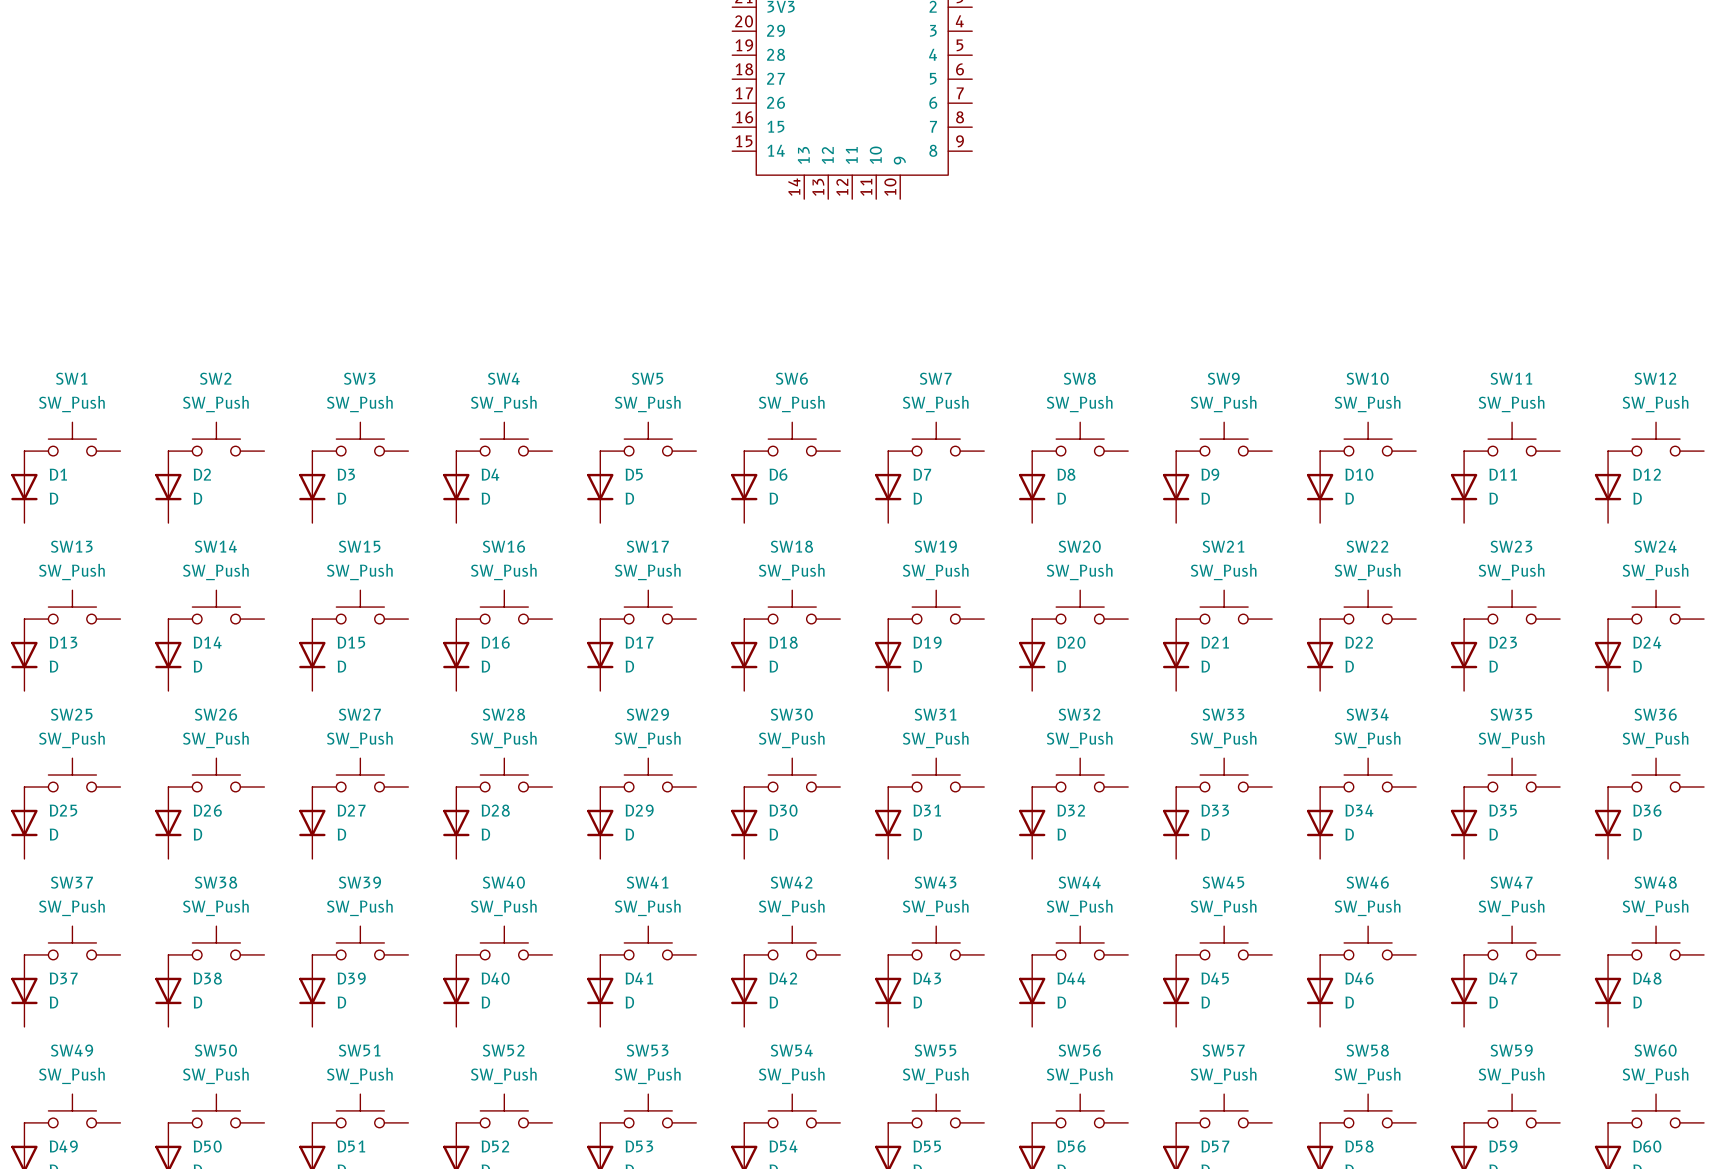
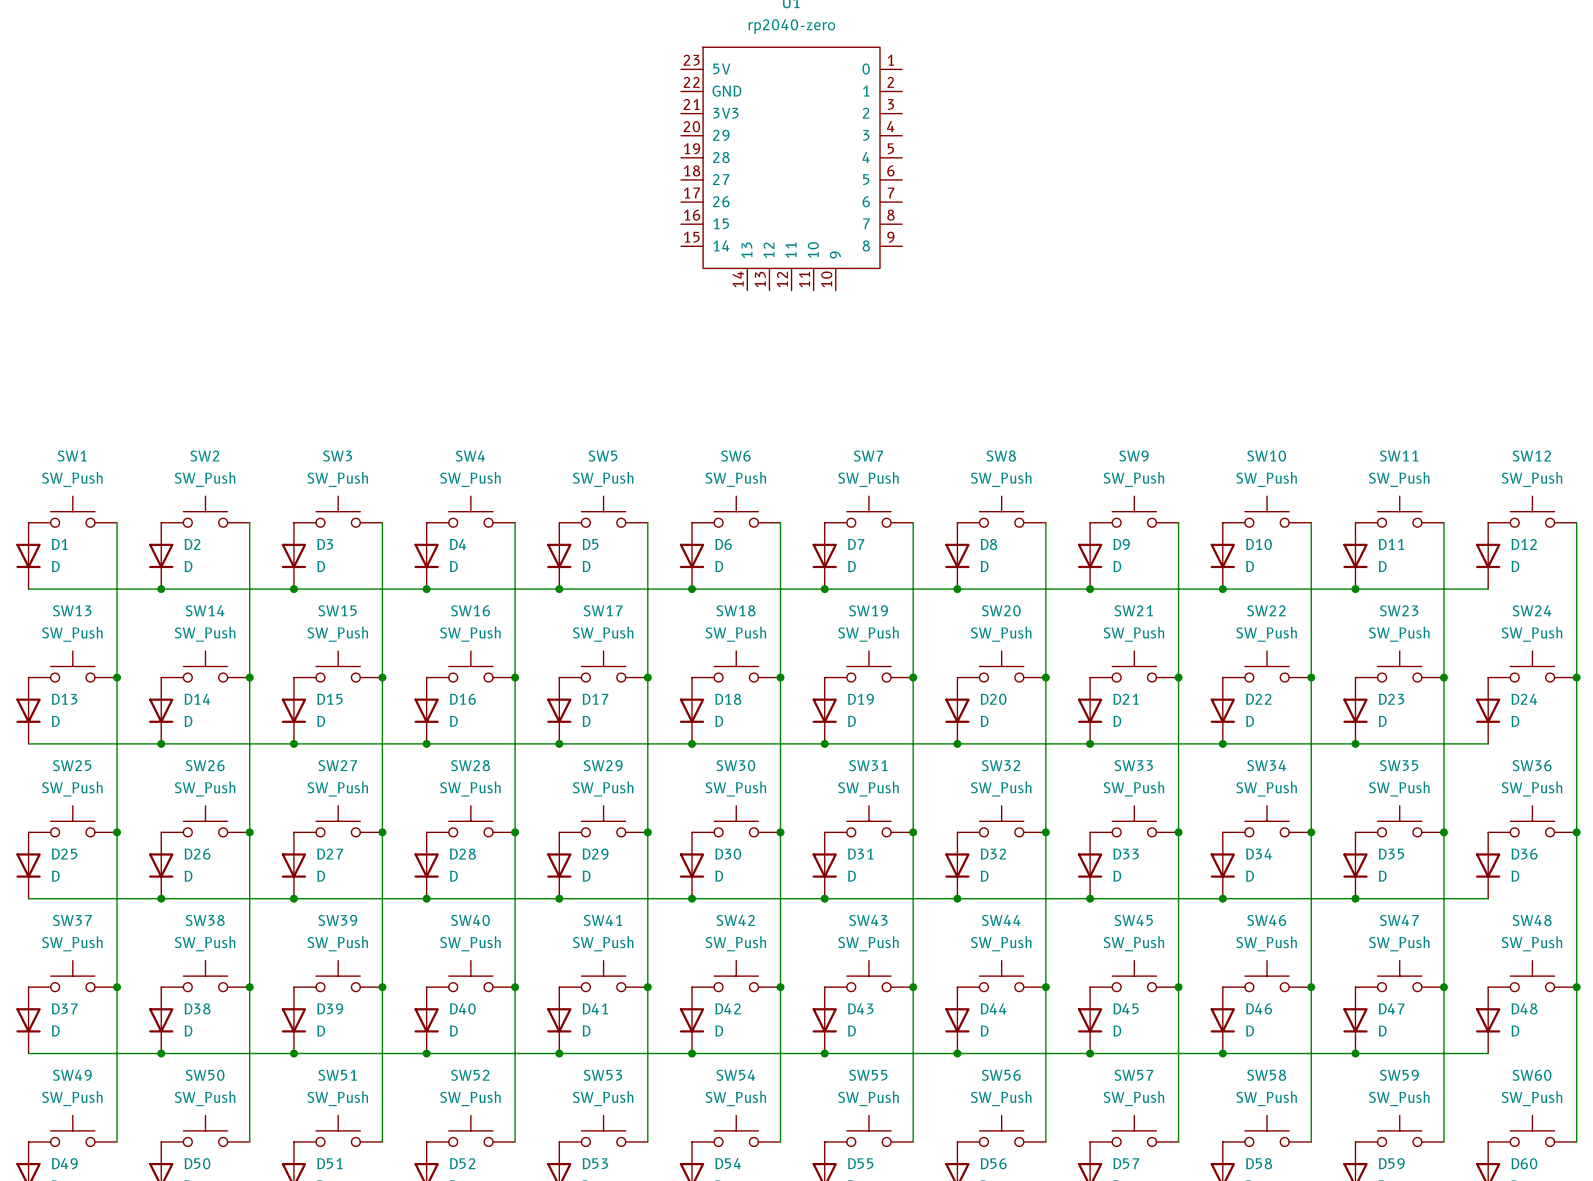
wire: none -> (117, 522) (117, 1141)
wire: none -> (249, 522) (249, 1141)
wire: none -> (382, 522) (382, 1141)
wire: none -> (515, 522) (515, 1141)
wire: none -> (647, 522) (647, 1141)
wire: none -> (780, 522) (780, 1141)
wire: none -> (913, 522) (913, 1141)
wire: none -> (1045, 522) (1045, 1141)
wire: none -> (1178, 522) (1178, 1141)
wire: none -> (1311, 522) (1311, 1141)
wire: none -> (1443, 522) (1443, 1141)
wire: none -> (1576, 522) (1576, 1141)
wire: none -> (28, 589) (1488, 589)
junction: none -> (161, 589)
junction: none -> (293, 589)
junction: none -> (426, 589)
junction: none -> (559, 589)
junction: none -> (692, 589)
junction: none -> (824, 589)
junction: none -> (957, 589)
junction: none -> (1090, 589)
junction: none -> (1222, 589)
junction: none -> (1355, 589)
junction: none -> (117, 677)
junction: none -> (249, 677)
junction: none -> (382, 677)
junction: none -> (515, 677)
junction: none -> (647, 677)
junction: none -> (780, 677)
junction: none -> (913, 677)
junction: none -> (1045, 677)
junction: none -> (1178, 677)
junction: none -> (1311, 677)
junction: none -> (1443, 677)
junction: none -> (1576, 677)
wire: none -> (28, 743) (1488, 743)
junction: none -> (161, 743)
junction: none -> (293, 743)
junction: none -> (426, 743)
junction: none -> (559, 743)
junction: none -> (692, 743)
junction: none -> (824, 743)
junction: none -> (957, 743)
junction: none -> (1090, 743)
junction: none -> (1222, 743)
junction: none -> (1355, 743)
junction: none -> (117, 832)
junction: none -> (249, 832)
junction: none -> (382, 832)
junction: none -> (515, 832)
junction: none -> (647, 832)
junction: none -> (780, 832)
junction: none -> (913, 832)
junction: none -> (1045, 832)
junction: none -> (1178, 832)
junction: none -> (1311, 832)
junction: none -> (1443, 832)
junction: none -> (1576, 832)
wire: none -> (28, 898) (1488, 898)
junction: none -> (161, 898)
junction: none -> (293, 898)
junction: none -> (426, 898)
junction: none -> (559, 898)
junction: none -> (692, 898)
junction: none -> (824, 898)
junction: none -> (957, 898)
junction: none -> (1090, 898)
junction: none -> (1222, 898)
junction: none -> (1355, 898)
junction: none -> (117, 987)
junction: none -> (249, 987)
junction: none -> (382, 987)
junction: none -> (515, 987)
junction: none -> (647, 987)
junction: none -> (780, 987)
junction: none -> (913, 987)
junction: none -> (1045, 987)
junction: none -> (1178, 987)
junction: none -> (1311, 987)
junction: none -> (1443, 987)
junction: none -> (1576, 987)
wire: none -> (28, 1053) (1488, 1053)
junction: none -> (161, 1053)
junction: none -> (293, 1053)
junction: none -> (426, 1053)
junction: none -> (559, 1053)
junction: none -> (692, 1053)
junction: none -> (824, 1053)
junction: none -> (957, 1053)
junction: none -> (1090, 1053)
junction: none -> (1222, 1053)
junction: none -> (1355, 1053)

